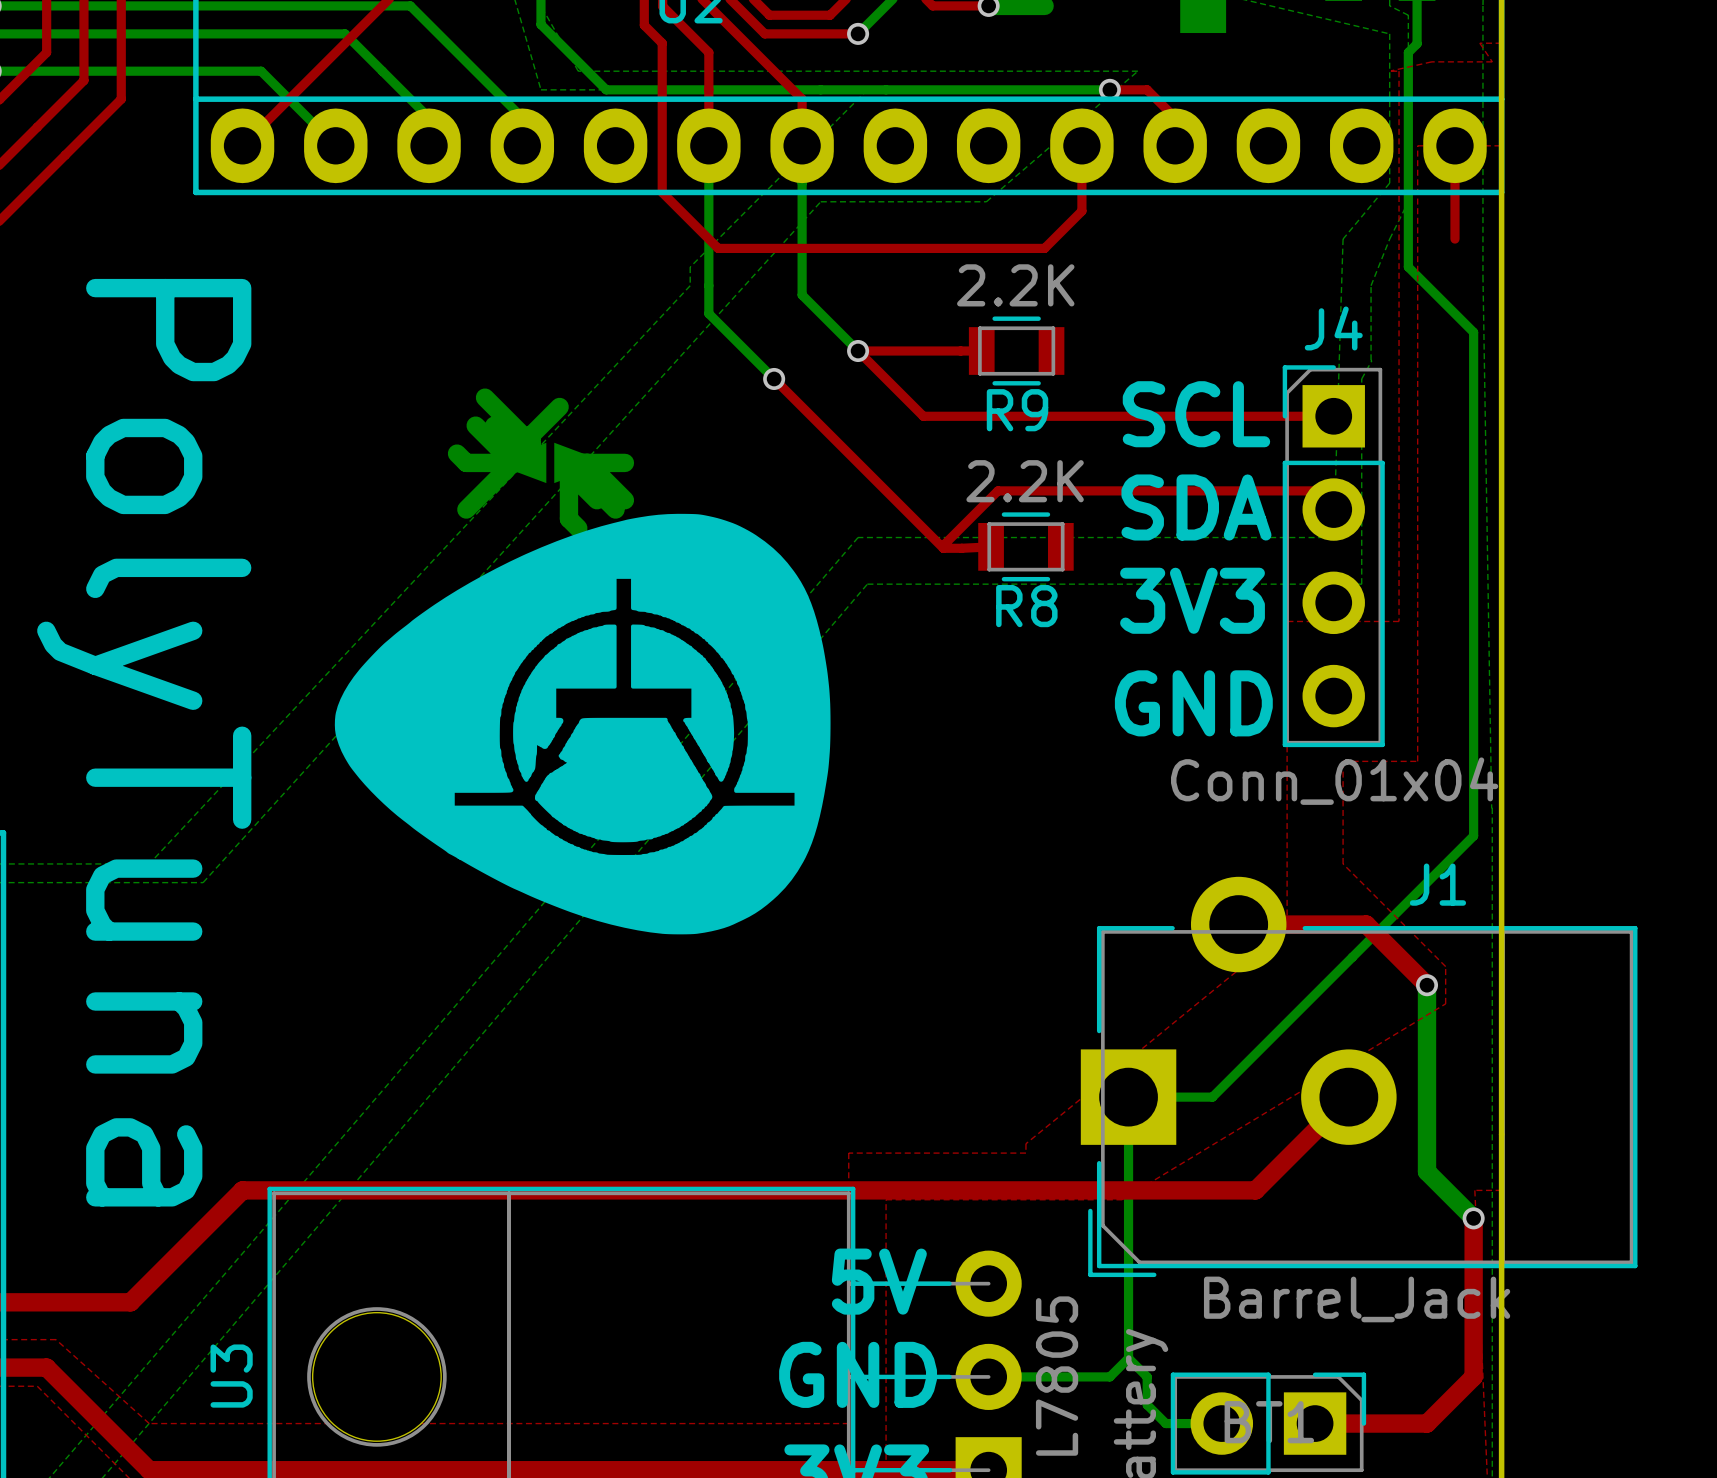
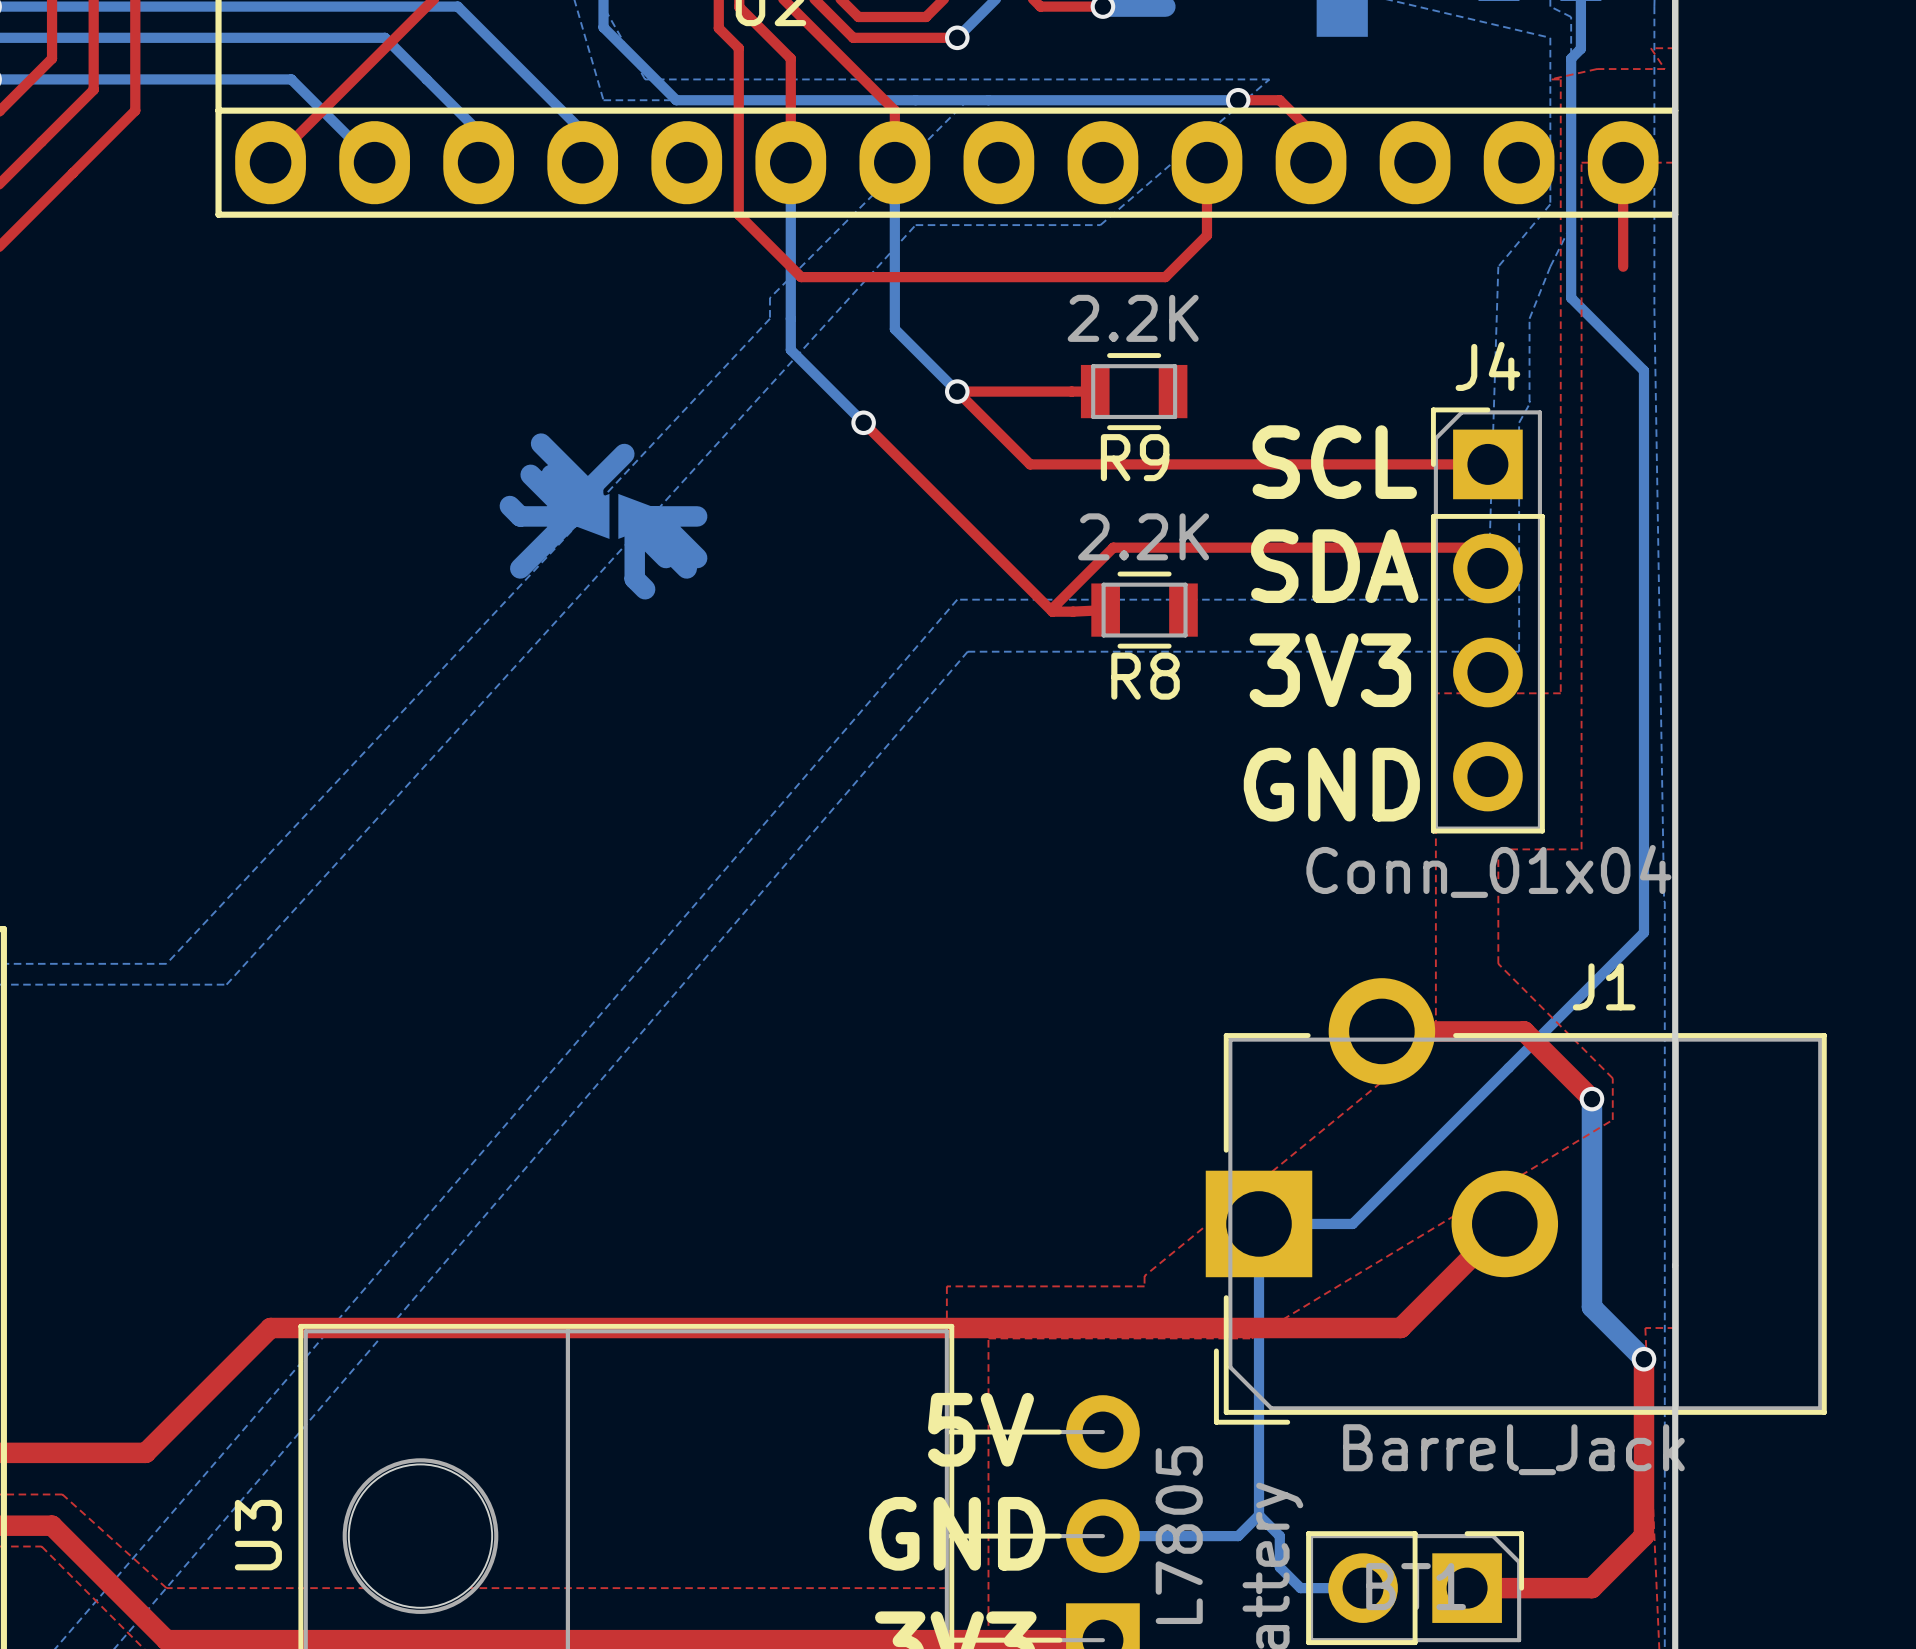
drawing: [334, 513, 831, 935] -> none
text: PolyTuna (144, 742) -> none

